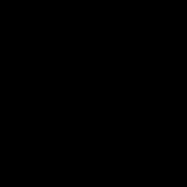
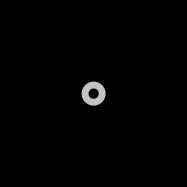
via: none -> (93, 93)

